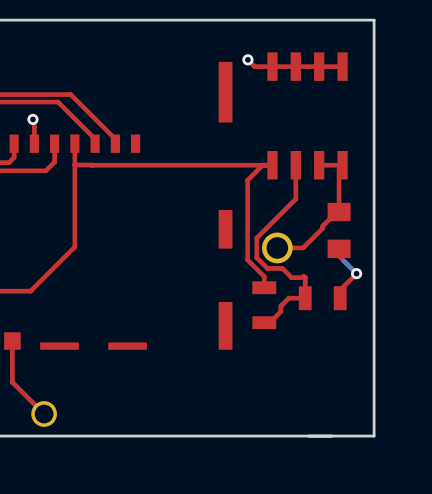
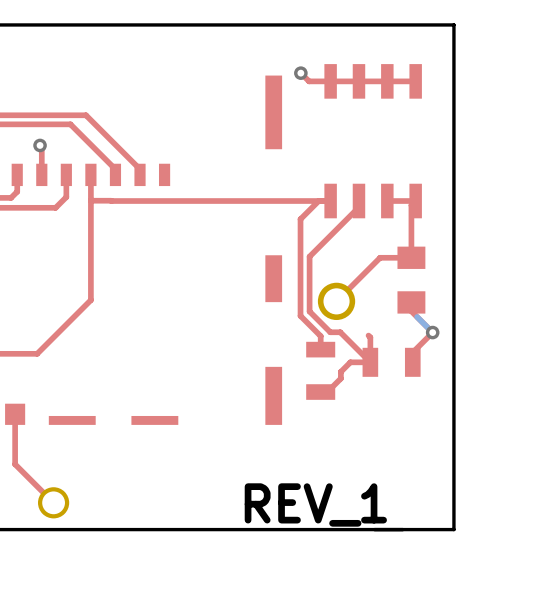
top track: (295, 170) (295, 199) (256, 238) (256, 257) (267, 268) (282, 268) (291, 277) (305, 277) -> (358, 207) (309, 256) (309, 311) (330, 332) (340, 332) (370, 362)
top track: (336, 212) (303, 247) (277, 247) -> (408, 257) (380, 257) (336, 301)
text: none -> REV_1 (315, 504)

